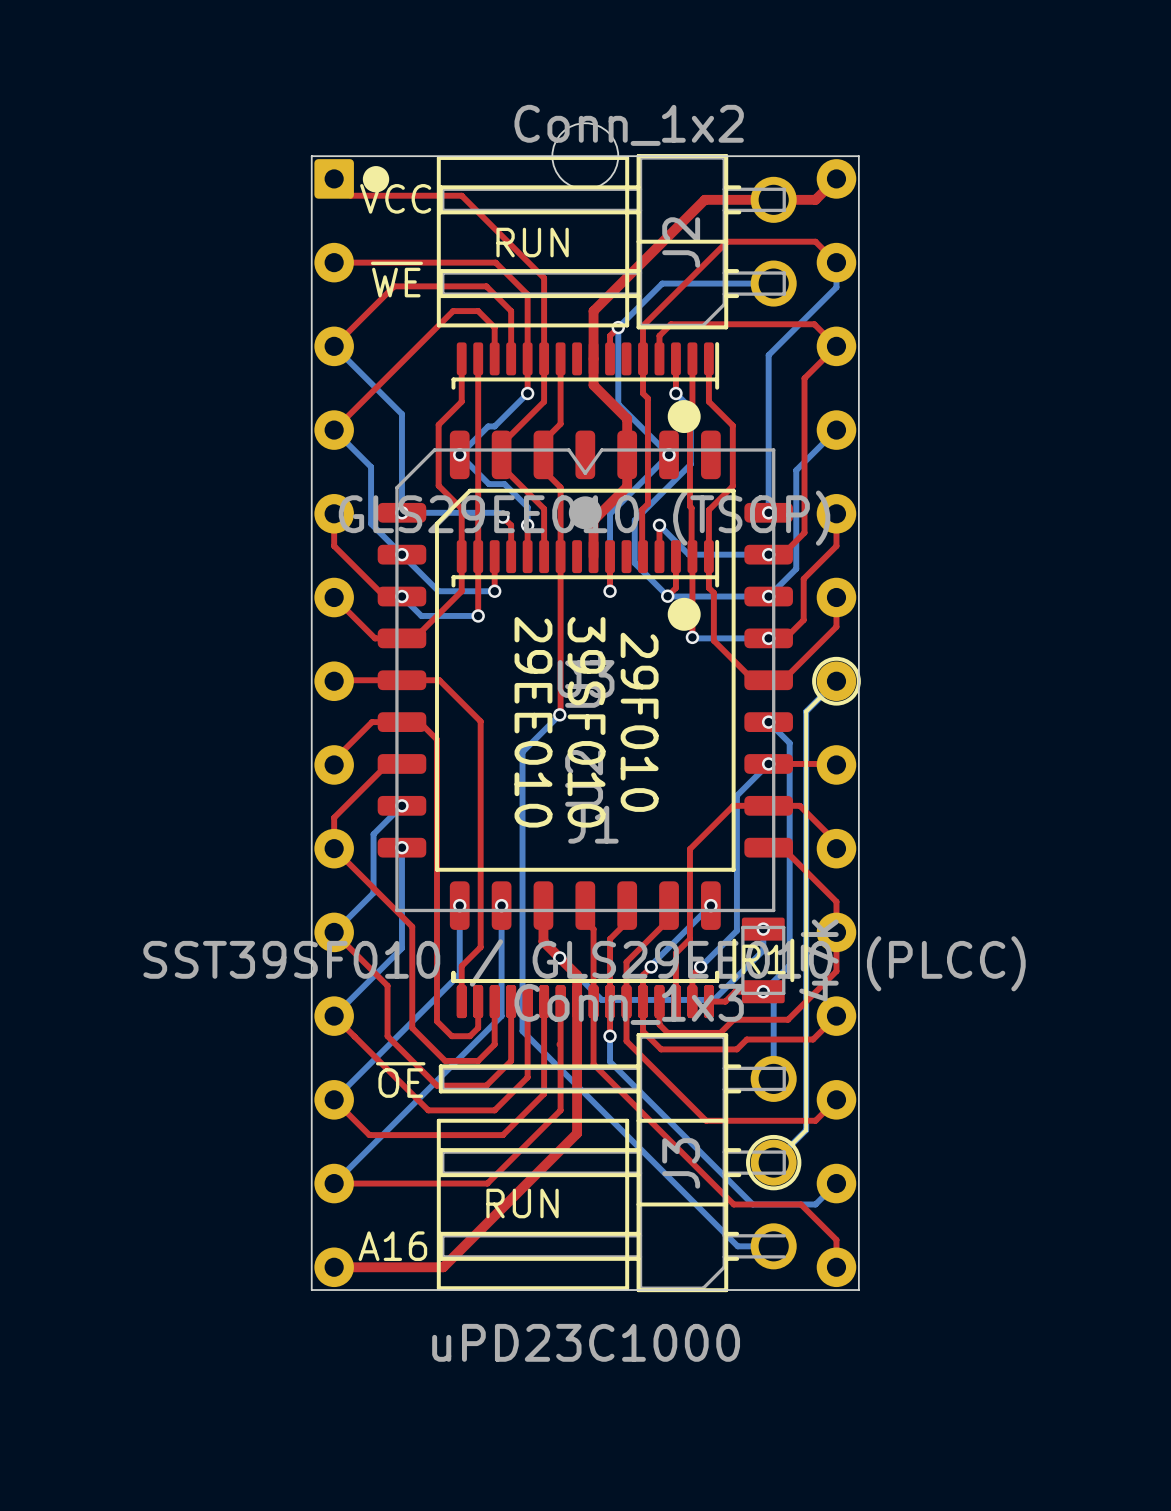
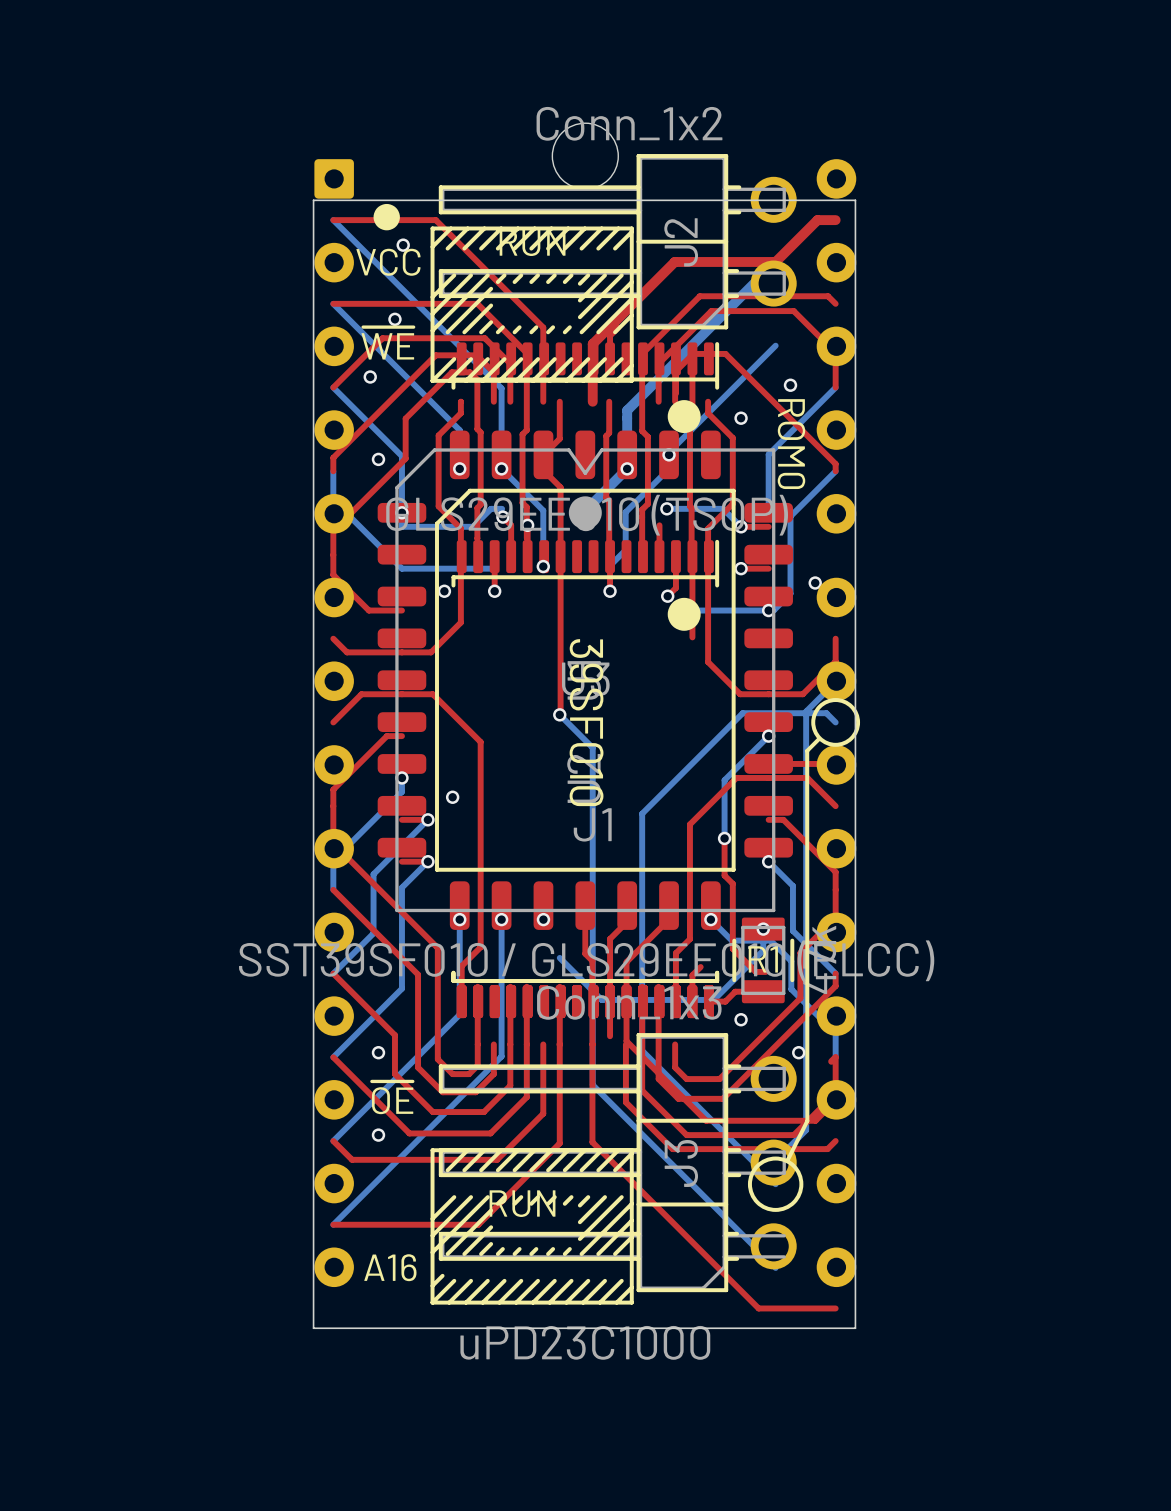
board edge: (311, 156) (311, 1290) (858, 1290) (858, 156) (311, 156) -> (313, 200) (313, 1328) (855, 1328) (855, 200) (313, 200)
line: (438, 157) (438, 325) (627, 325) (627, 157) (438, 157) -> none
top track: (334, 178) (350, 195) (461, 195) (544, 278) (544, 401) (501, 444) (501, 466) (544, 508) (544, 556) -> none
top track: (836, 178) (815, 199) (704, 199) (593, 311) (593, 385) (627, 418) (627, 486) (593, 520) (593, 556) -> none
drawing position: (376, 179) -> (386, 217)
text position: VCC (395, 198) -> VCC (388, 262)
top track: none -> (333, 220) (435, 220) (543, 327) (543, 401)
bottom track: none -> (333, 220) (501, 388) (501, 468) (543, 510) (543, 566)
top track: none -> (835, 220) (817, 220) (775, 261) (674, 261) (592, 344) (592, 401)
line: none -> (450, 228) (432, 246)
line: none -> (467, 228) (447, 248)
line: none -> (484, 228) (464, 248)
line: none -> (501, 228) (481, 248)
line: none -> (517, 228) (497, 248)
line: none -> (534, 228) (514, 248)
line: none -> (551, 228) (531, 248)
line: none -> (568, 228) (548, 248)
line: none -> (584, 228) (564, 248)
line: none -> (601, 228) (581, 248)
line: none -> (618, 228) (598, 248)
line: none -> (631, 231) (615, 248)
via: none -> (403, 245)
bottom track: none -> (775, 261) (627, 410) (627, 468) (592, 503) (592, 517)
top track: (334, 262) (495, 262) (527, 294) (527, 393) -> none
top track: (836, 262) (815, 241) (727, 241) (643, 325) (643, 393) (647, 398) (647, 436) -> (835, 303) (828, 296) (699, 296) (642, 353) (642, 431) (647, 436)
bottom track: (836, 262) (836, 287) (768, 355) (768, 454) -> (835, 387) (768, 454)
line: none -> (454, 275) (432, 297)
line: none -> (471, 275) (432, 313)
line: none -> (487, 275) (432, 330)
line: none -> (504, 275) (497, 282)
line: none -> (521, 275) (514, 282)
line: none -> (538, 275) (531, 282)
line: none -> (554, 275) (548, 282)
line: none -> (571, 275) (564, 282)
line: none -> (588, 275) (579, 283)
line: none -> (604, 275) (579, 300)
line: none -> (621, 275) (579, 317)
text position: ~{WE} (396, 279) -> ~{WE} (387, 343)
line: none -> (631, 282) (581, 332)
bottom track: (773, 283) (662, 283) (618, 327) (618, 404) (669, 454) (610, 513) (610, 591) -> none
line: none -> (491, 288) (447, 332)
line: none -> (631, 298) (598, 332)
top track: none -> (333, 303) (477, 303) (526, 353) (526, 430) (522, 434) (522, 502) (526, 507) (526, 538)
bottom track: none -> (333, 303) (459, 430) (459, 468)
line: none -> (491, 305) (464, 332)
line: none -> (631, 315) (615, 332)
via: none -> (394, 319)
line: none -> (491, 322) (481, 332)
line: none -> (502, 327) (497, 332)
line: none -> (519, 327) (514, 332)
line: none -> (536, 327) (531, 332)
line: none -> (553, 327) (548, 332)
line: none -> (569, 327) (564, 332)
via: (618, 327) -> none
bottom track: none -> (775, 345) (669, 452) (669, 468) (625, 512) (625, 550) (609, 566)
top track: (334, 346) (394, 286) (486, 286) (511, 311) (511, 358) -> none
bottom track: (334, 346) (401, 414) (401, 456) -> (333, 387) (401, 456)
top track: (461, 358) (461, 401) (438, 424) (438, 435) -> (460, 401) (460, 413) (438, 435)
top track: (478, 358) (478, 615) -> none
top track: (494, 358) (494, 327) (478, 311) (453, 311) (334, 430) -> none
top track: (560, 358) (560, 423) (543, 441) (543, 455) -> (559, 401) (559, 438) (543, 455)
top track: (659, 358) (659, 335) (671, 324) (814, 324) (836, 346) (804, 378) (804, 532) (782, 554) (768, 554) -> none
top track: (708, 358) (708, 401) (732, 425) (732, 437) -> (708, 401) (708, 413) (732, 437)
line: none -> (454, 359) (432, 380)
line: none -> (471, 359) (449, 380)
line: none -> (487, 359) (466, 380)
line: none -> (504, 359) (482, 380)
line: none -> (521, 359) (499, 380)
line: none -> (538, 359) (516, 380)
line: none -> (554, 359) (532, 380)
line: none -> (571, 359) (549, 380)
line: none -> (588, 359) (566, 380)
line: none -> (604, 359) (583, 380)
line: none -> (621, 359) (599, 380)
line: none -> (631, 365) (616, 380)
via: none -> (370, 377)
line: none -> (432, 380) (631, 380) (631, 228) (432, 228) (432, 380)
via: none -> (790, 385)
top track: none -> (333, 387) (382, 338) (484, 338) (510, 363) (510, 401)
top track: none -> (835, 387) (835, 352) (793, 311) (711, 311) (658, 363) (658, 401)
bottom track: (527, 393) (494, 426) (488, 426) (459, 454) (488, 484) (504, 484) (527, 507) (527, 525) -> none
via: (527, 393) -> none
bottom track: (675, 393) (690, 408) (690, 464) (634, 520) (634, 563) (668, 596) (768, 596) (796, 568) (796, 470) (836, 430) -> none
via: (675, 393) -> none
top track: none -> (493, 401) (493, 372) (476, 355) (435, 355) (333, 457) (333, 471)
top track: none -> (609, 401) (609, 433) (606, 436) (609, 566)
top track: none -> (675, 401) (675, 372) (693, 353) (725, 353) (835, 464) (835, 471)
via: none -> (741, 418)
bottom track: (334, 430) (371, 466) (371, 523) (438, 591) (494, 591) -> none
text: none -> ROM0 (791, 444)
via position: (459, 454) -> (459, 468)
via: none -> (378, 459)
via: none -> (501, 468)
via: none -> (627, 468)
bottom track: none -> (333, 471) (333, 500) (401, 568) (491, 568) (493, 566)
bottom track: none -> (835, 471) (790, 516) (790, 593) (773, 610) (677, 610) (675, 607)
top track: (438, 485) (461, 508) (461, 591) (414, 638) (375, 638) (334, 597) -> (438, 485) (438, 506) (460, 528) (460, 622) (431, 652) (347, 652) (333, 638)
top track: (732, 486) (708, 510) (708, 587) (713, 592) (713, 640) (753, 680) (783, 680) (836, 626) (836, 597) -> (732, 486) (732, 503) (708, 528) (708, 662) (740, 694) (802, 694) (835, 661) (835, 638)
bottom track: none -> (666, 508) (723, 508) (741, 526)
bottom track: (401, 512) (498, 512) (502, 517) -> (401, 512) (401, 526) (473, 526) (491, 508) (502, 508)
via: (768, 512) -> none
top track: (334, 513) (334, 546) (384, 596) (401, 596) -> none
top track: (836, 513) (836, 546) (803, 578) (803, 620) (785, 638) (768, 638) -> none
bottom track: (659, 525) (688, 554) (770, 554) -> none
via position: (659, 525) -> (666, 508)
top track: none -> (741, 526) (768, 526)
via: none -> (741, 526)
top track: none -> (477, 538) (477, 508) (480, 504) (480, 432) (477, 429) (477, 379) (470, 372) (451, 372) (405, 418) (405, 458) (333, 530) (333, 574) (368, 610) (401, 610)
via: (401, 554) -> none
via: (768, 554) -> none
via: none -> (543, 566)
top track: none -> (741, 568) (768, 568)
via: none -> (741, 568)
via: none -> (815, 583)
via: none -> (444, 591)
bottom track: (401, 596) (421, 615) (478, 615) -> none
via: (401, 596) -> none
via: (768, 596) -> none
via: none -> (768, 610)
via: (478, 615) -> none
bottom track: (692, 637) (768, 638) -> none
via: (692, 637) -> none
via: (768, 638) -> none
top track: (334, 681) (439, 680) (480, 721) (480, 742) -> (333, 722) (361, 694) (432, 694) (480, 742)
drawing position: (836, 681) -> (835, 722)
line: (819, 698) (806, 711) (806, 1130) (792, 1143) -> none
bottom track: (559, 714) (522, 752) (522, 1031) (737, 1246) (773, 1246) -> (559, 714) (592, 747) (592, 1085) (775, 1267)
text: 29EE010 (533, 722) -> none
text: 29F010 (639, 722) -> none
bottom track: (768, 722) (789, 743) (789, 965) (763, 991) (773, 1002) (773, 1078) -> none
via: (768, 722) -> none
bottom track: none -> (835, 722) (826, 713) (742, 713) (642, 813) (642, 1050) (775, 1184)
top track: none -> (401, 736) (386, 736) (333, 789) (333, 843) (437, 948) (437, 1059) (452, 1074) (469, 1074) (477, 1065) (477, 986)
bottom track: none -> (768, 736) (724, 780) (724, 838)
via: none -> (768, 736)
line: none -> (818, 739) (807, 750) (807, 1121) (787, 1159)
top track: (401, 763) (387, 763) (334, 817) (334, 848) (412, 926) (412, 1027) (445, 1060) (478, 1060) (494, 1044) (494, 1001) -> none
bottom track: (768, 763) (736, 795) (736, 930) (700, 967) -> none
via: (768, 763) -> none
top track: (334, 764) (334, 760) (372, 722) (419, 722) (436, 739) (436, 1021) (451, 1036) (469, 1036) (478, 1027) (478, 1001) -> none
bottom track: none -> (401, 777) (401, 791) (333, 860) (333, 889)
via: none -> (401, 777)
via: none -> (452, 797)
bottom track: (401, 805) (373, 834) (373, 874) -> (427, 819) (373, 874)
via: (401, 805) -> none
top track: none -> (401, 819) (427, 819)
via: none -> (427, 819)
top track: none -> (768, 819) (783, 819) (835, 872) (835, 917) (800, 952) (800, 998) (719, 1079) (686, 1079) (675, 1067) (675, 1044)
top track: none -> (724, 838) (724, 875) (732, 883) (732, 948) (755, 971) (765, 971)
via: none -> (724, 838)
bottom track: (401, 847) (401, 887) -> (427, 861) (401, 887)
via: (401, 847) -> none
top track: (768, 847) (782, 847) (836, 901) (836, 971) (788, 1019) (733, 1019) (720, 1032) (667, 1032) (659, 1024) (659, 1001) -> none
top track: (836, 848) (836, 842) (799, 805) (733, 805) (689, 849) -> (835, 806) (807, 777) (736, 777) (689, 824) (689, 849)
top track: none -> (401, 861) (427, 861)
via: none -> (427, 861)
bottom track: none -> (768, 861) (792, 886) (792, 930) (835, 973)
via: none -> (768, 861)
top track: none -> (333, 889) (418, 974) (418, 1067) (442, 1092) (475, 1092) (493, 1074) (493, 1044)
bottom track: (373, 893) (334, 932) -> (373, 893) (373, 933) (333, 973)
via position: (459, 905) -> (459, 919)
via position: (501, 905) -> (501, 919)
top track: (543, 905) (543, 941) (577, 975) (577, 1133) (443, 1267) (334, 1267) -> none
bottom track: (710, 905) (651, 967) -> none
via position: (710, 905) -> (710, 919)
via: none -> (543, 919)
bottom track: none -> (710, 919) (731, 940) (770, 940) (791, 961) (791, 989) (835, 1033) (835, 1057)
top track: (585, 920) (593, 929) (593, 1064) (733, 1204) (801, 1204) (836, 1239) (836, 1267) -> (585, 920) (585, 953) (592, 960) (592, 1142) (758, 1308) (835, 1308)
top track: (334, 932) (387, 985) (387, 1036) (436, 1085) (486, 1085) (511, 1060) (510, 1002) -> none
bottom track: (401, 948) (334, 1016) -> (401, 948) (401, 988) (333, 1057)
via: (559, 957) -> none
top track: (651, 967) (643, 975) (643, 1031) (661, 1049) (736, 1049) (746, 1039) (813, 1039) (836, 1016) -> none
via: (651, 967) -> none
via: (700, 967) -> none
top track: none -> (333, 973) (394, 1035) (394, 1074) (432, 1112) (483, 1112) (510, 1085) (510, 986)
top track: none -> (835, 973) (835, 986) (722, 1098) (678, 1098) (658, 1079) (658, 986)
bottom track: (459, 974) (334, 1099) -> (459, 974) (459, 1014) (333, 1141)
top track: none -> (526, 986) (526, 1097) (490, 1133) (409, 1133) (333, 1057)
top track: none -> (559, 986) (559, 1143) (478, 1224) (333, 1224)
top track: none -> (642, 986) (642, 1090) (686, 1135) (793, 1135) (835, 1093) (835, 1057) (831, 1061)
via: (763, 991) -> none
top track: (527, 1001) (527, 1077) (494, 1110) (428, 1110) (334, 1016) -> none
top track: (544, 1001) (544, 1093) (502, 1135) (369, 1135) (334, 1099) -> none
top track: (560, 1001) (560, 1110) (487, 1183) (334, 1183) -> none
bottom track: (501, 1016) (334, 1183) -> (501, 1016) (501, 1056) (333, 1224)
via: none -> (741, 1019)
bottom track: (610, 1036) (610, 1061) (752, 1204) (815, 1204) (836, 1183) -> none
via: (610, 1036) -> none
top track: none -> (543, 1044) (543, 1113) (497, 1159) (352, 1159) (333, 1141)
top track: none -> (625, 1044) (625, 1102) (672, 1149) (827, 1149) (835, 1141)
via: none -> (378, 1052)
via: none -> (798, 1052)
text position: ~{OE} (400, 1079) -> ~{OE} (392, 1097)
line: (438, 1120) (438, 1288) (627, 1288) (627, 1120) (438, 1120) -> (432, 1302) (432, 1150) (631, 1150) (631, 1302) (432, 1302)
via: none -> (378, 1135)
line: none -> (467, 1150) (447, 1170)
line: none -> (484, 1150) (464, 1170)
line: none -> (501, 1150) (481, 1170)
line: none -> (517, 1150) (497, 1170)
line: none -> (534, 1150) (514, 1170)
line: none -> (551, 1150) (531, 1170)
line: none -> (568, 1150) (548, 1170)
line: none -> (584, 1150) (564, 1170)
line: none -> (601, 1150) (581, 1170)
line: none -> (618, 1150) (598, 1170)
line: none -> (631, 1153) (615, 1170)
drawing position: (773, 1162) -> (775, 1184)
line: none -> (454, 1197) (432, 1218)
line: none -> (471, 1197) (432, 1235)
line: none -> (487, 1197) (432, 1252)
line: none -> (504, 1197) (497, 1203)
line: none -> (521, 1197) (514, 1203)
line: none -> (538, 1197) (531, 1203)
line: none -> (554, 1197) (548, 1203)
line: none -> (571, 1197) (564, 1203)
line: none -> (588, 1197) (579, 1205)
line: none -> (604, 1197) (579, 1222)
line: none -> (621, 1197) (579, 1238)
line: none -> (631, 1203) (581, 1254)
line: none -> (491, 1210) (447, 1254)
line: none -> (631, 1220) (598, 1254)
line: none -> (491, 1227) (464, 1254)
line: none -> (631, 1237) (615, 1254)
line: none -> (491, 1244) (481, 1254)
text position: A16 (392, 1246) -> A16 (390, 1267)
line: none -> (502, 1249) (497, 1254)
line: none -> (519, 1249) (514, 1254)
line: none -> (536, 1249) (531, 1254)
line: none -> (553, 1249) (548, 1254)
line: none -> (569, 1249) (564, 1254)
line: none -> (442, 1275) (432, 1285)
line: none -> (454, 1280) (432, 1302)
line: none -> (471, 1280) (449, 1302)
line: none -> (487, 1280) (466, 1302)
line: none -> (504, 1280) (482, 1302)
line: none -> (521, 1280) (499, 1302)
line: none -> (538, 1280) (516, 1302)
line: none -> (554, 1280) (532, 1302)
line: none -> (571, 1280) (549, 1302)
line: none -> (588, 1280) (566, 1302)
line: none -> (604, 1280) (583, 1302)
line: none -> (621, 1280) (599, 1302)
line: none -> (631, 1287) (616, 1302)

